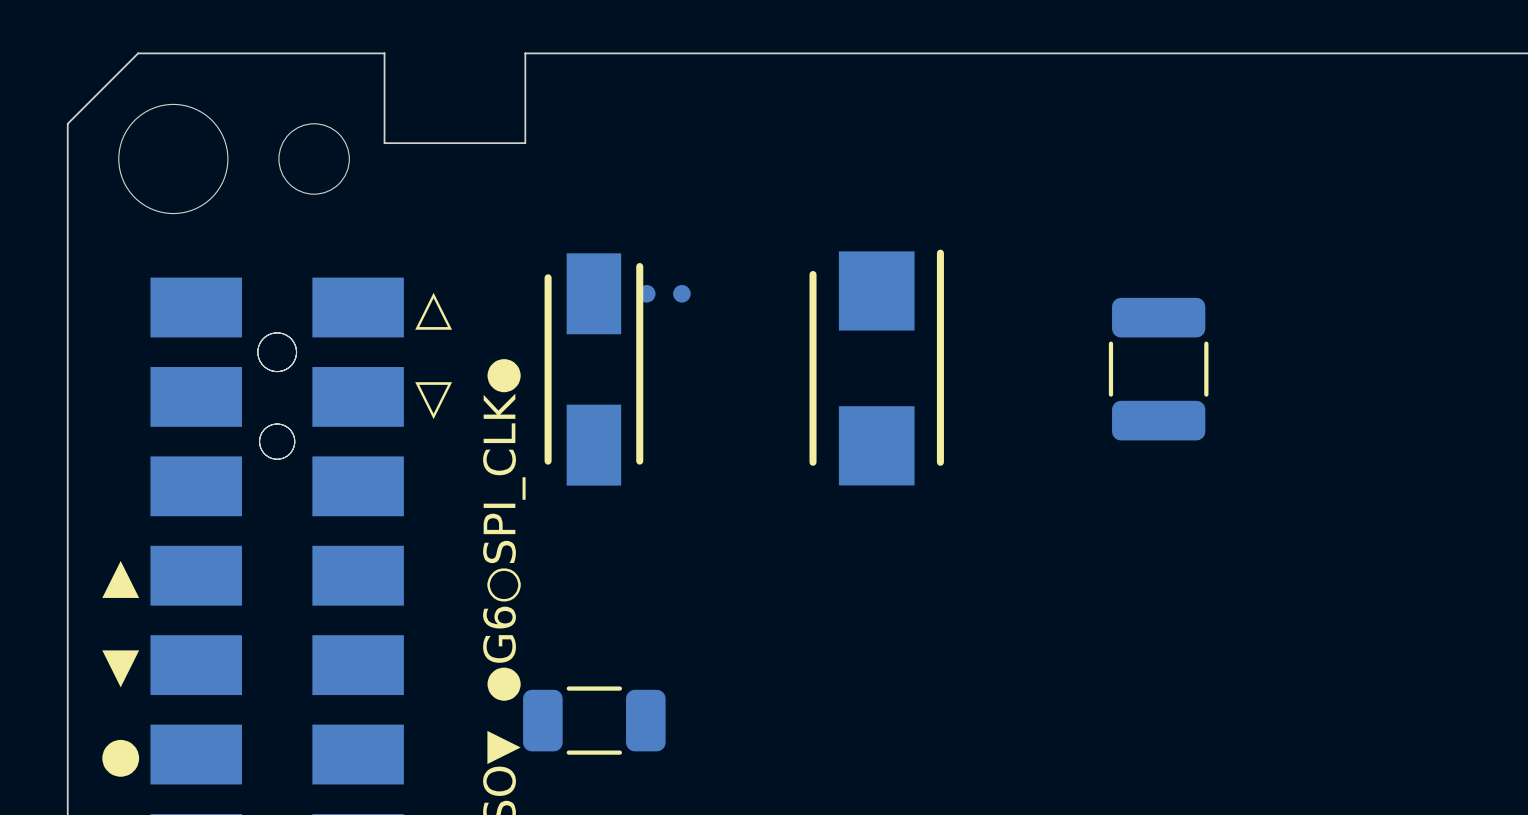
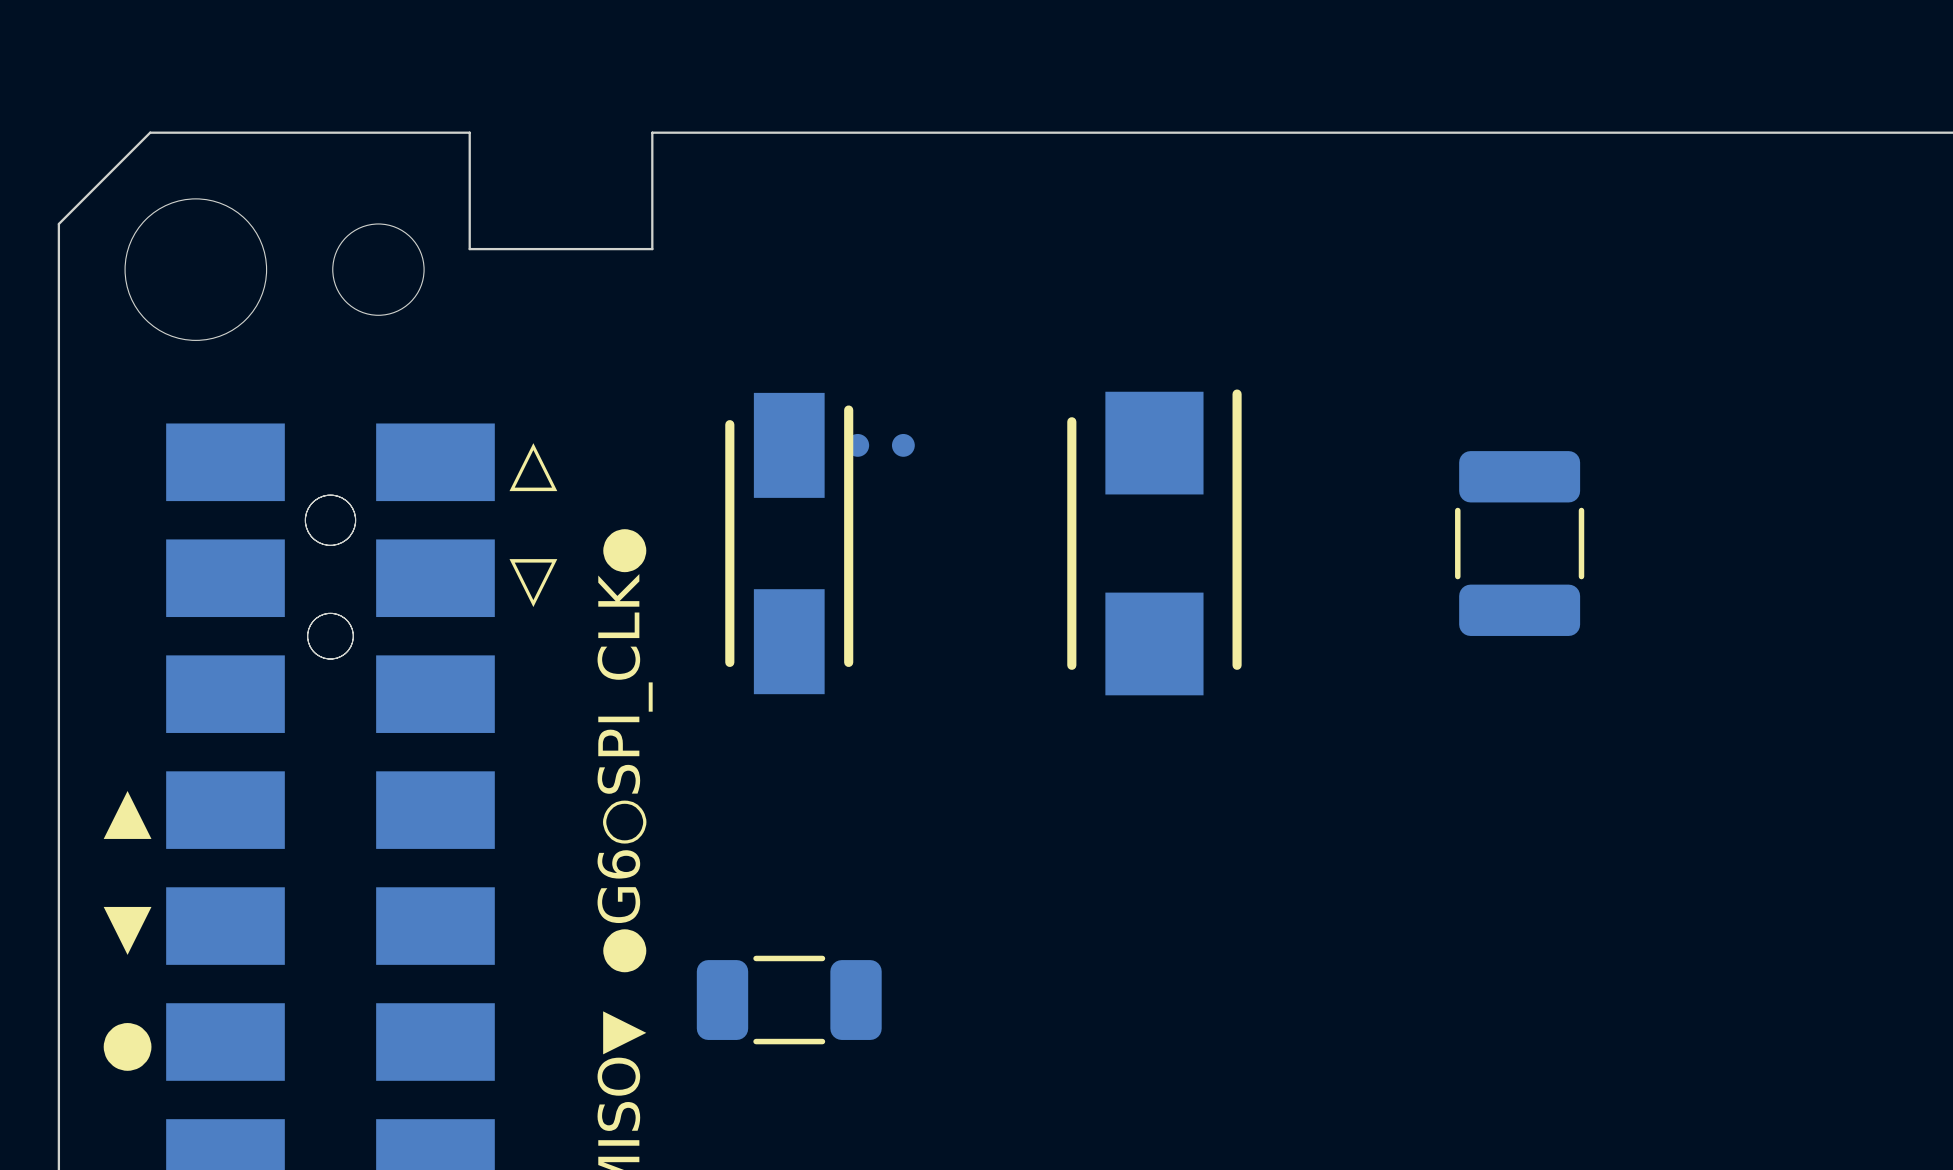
part position: (664, 293) -> (880, 445)
part position: (876, 367) -> (1154, 542)
part position: (593, 369) -> (789, 543)
part position: (1158, 369) -> (1519, 543)
part position: (594, 720) -> (789, 1000)

